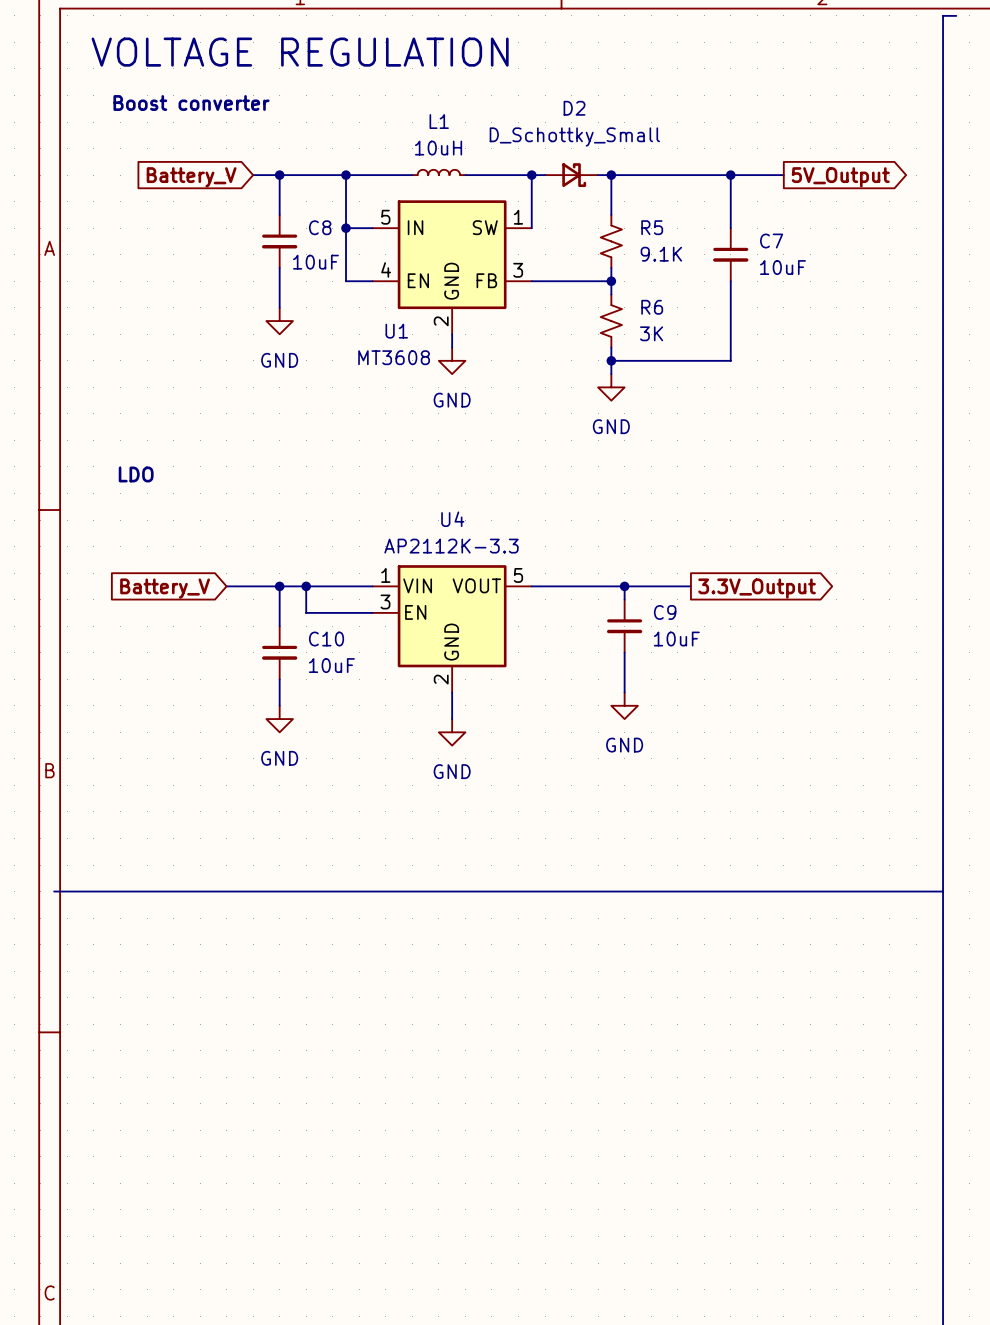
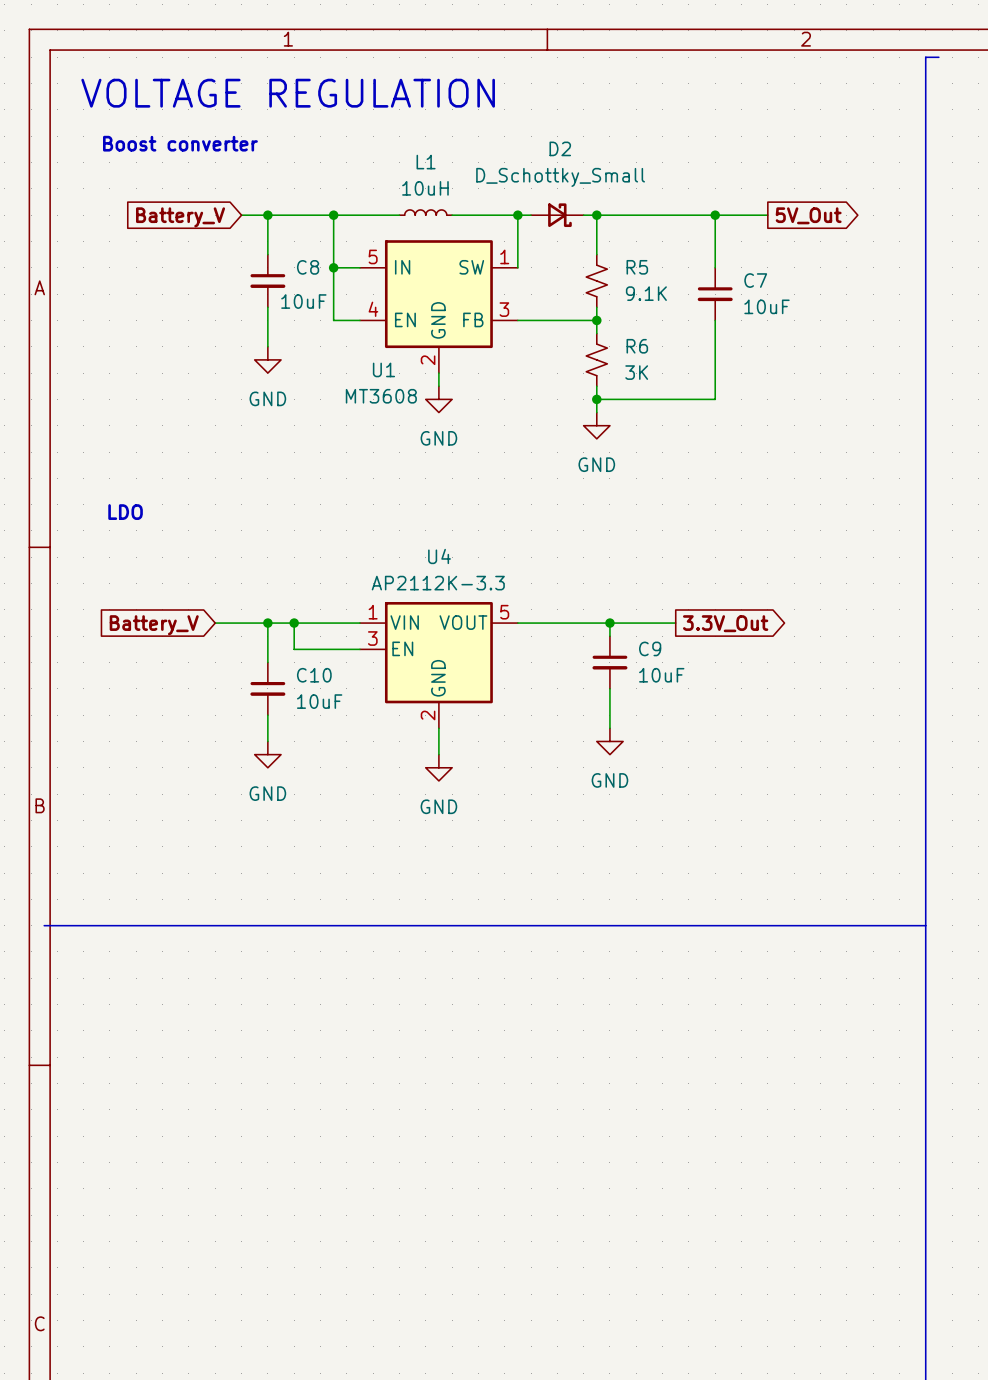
global label: 5V_Output (840, 177) -> 5V_Out (808, 215)
global label: 3.3V_Output (757, 588) -> 3.3V_Out (725, 623)

